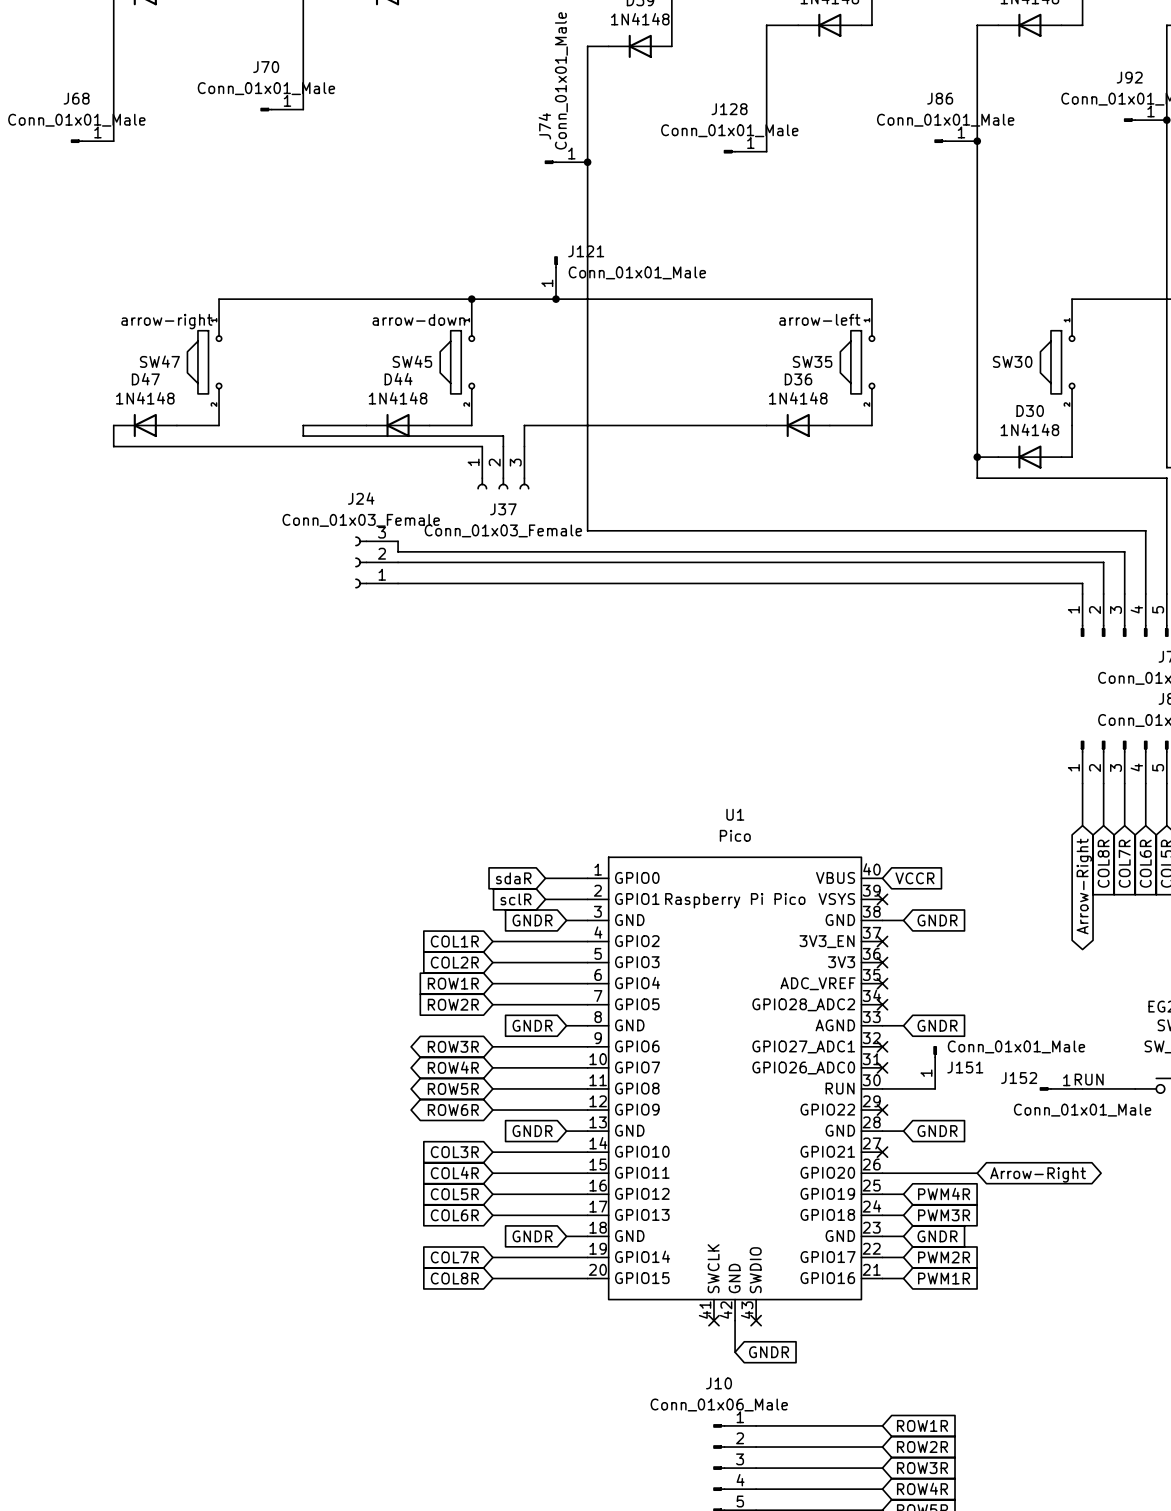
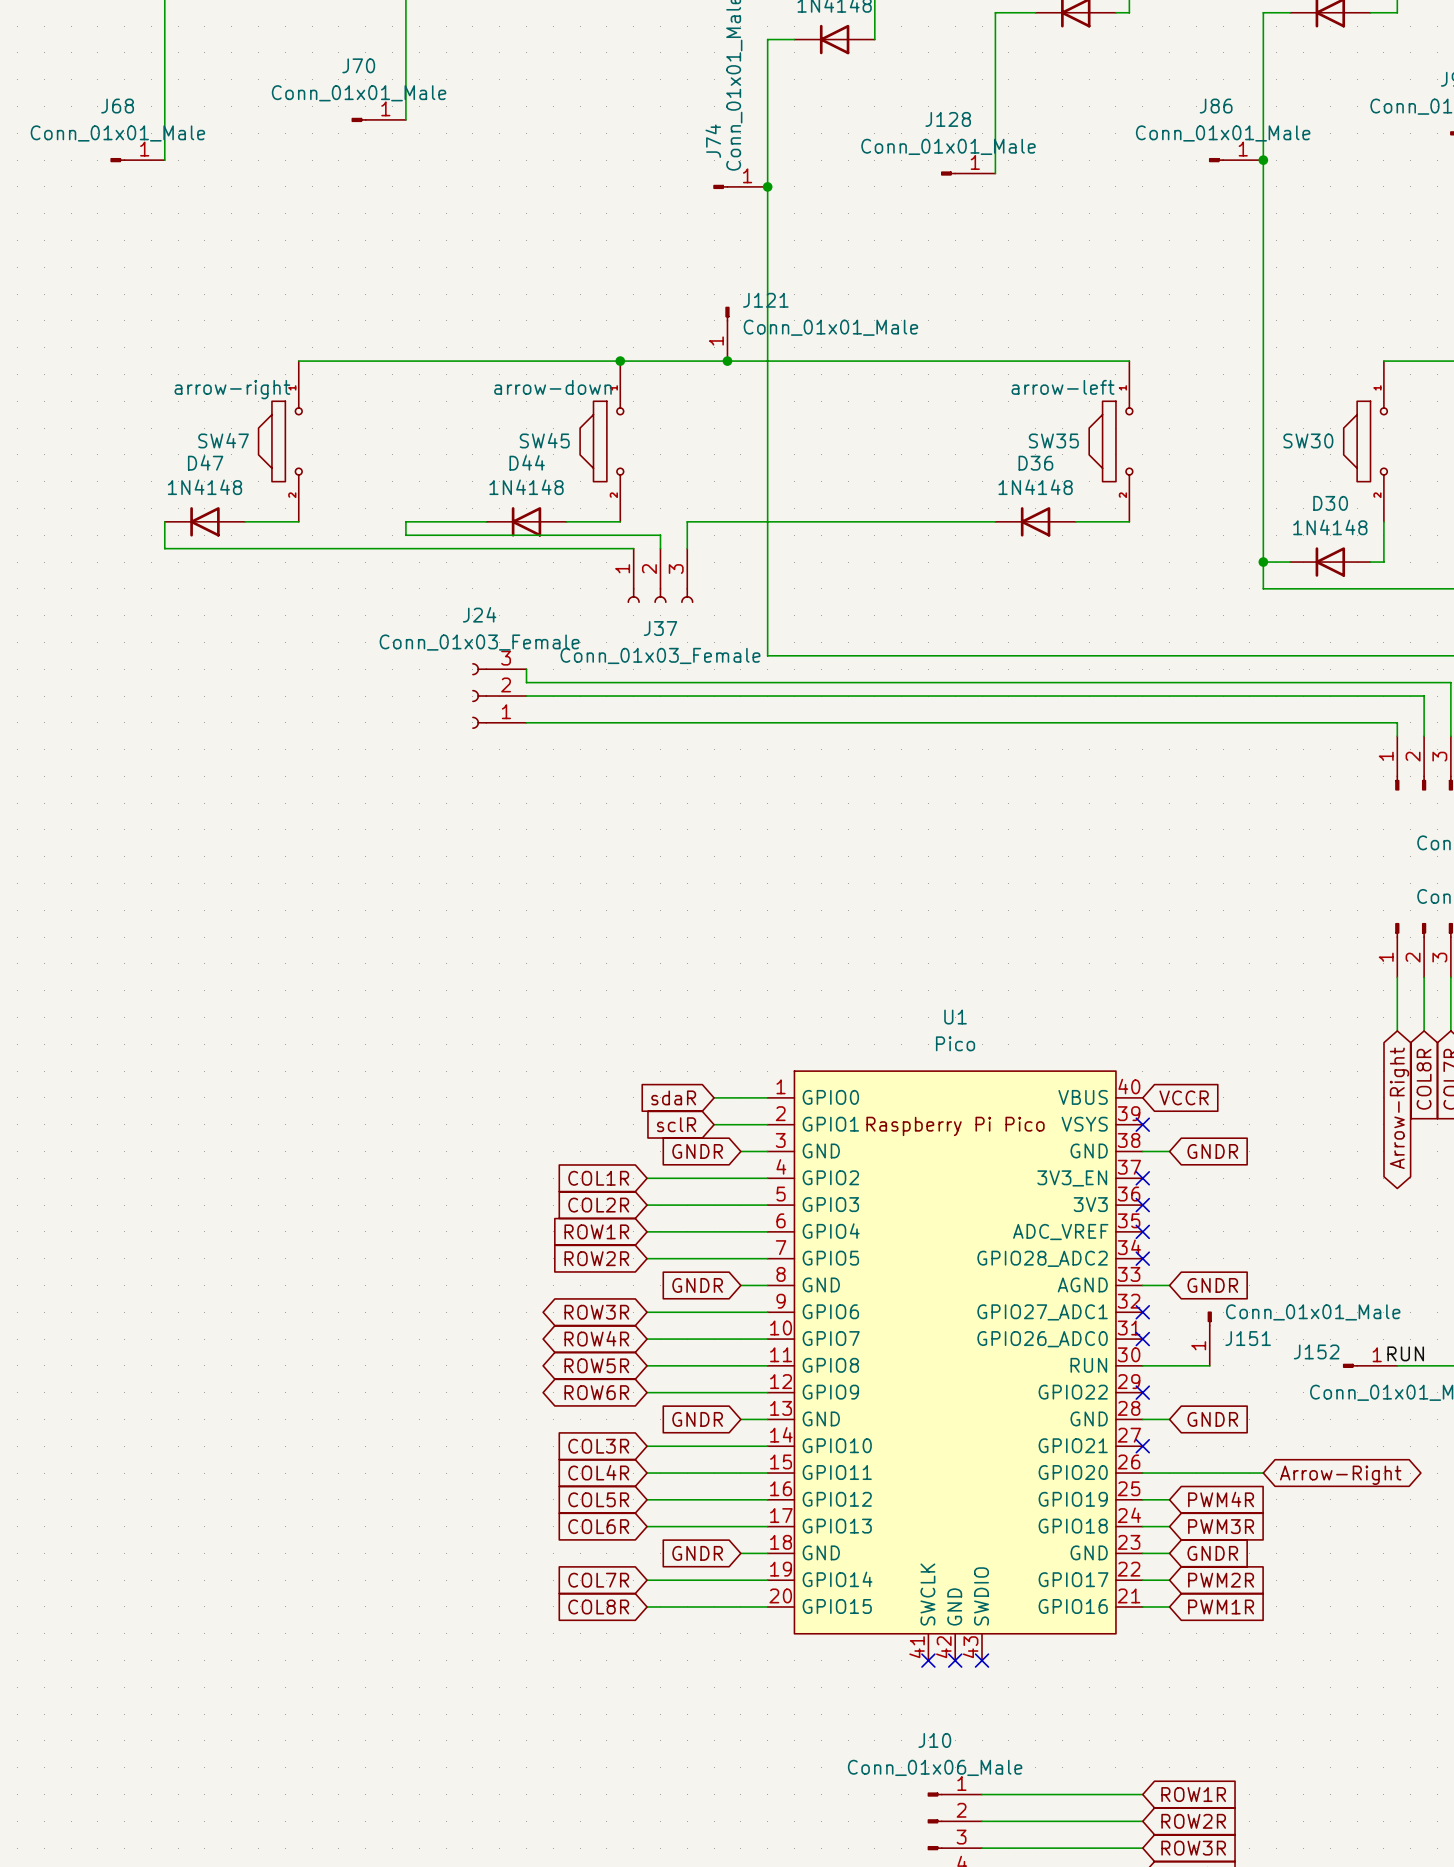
wire: (735, 1320) (735, 1352) -> none
no-connect mark: none -> (955, 1660)
global label: GNDR (769, 1352) -> none

